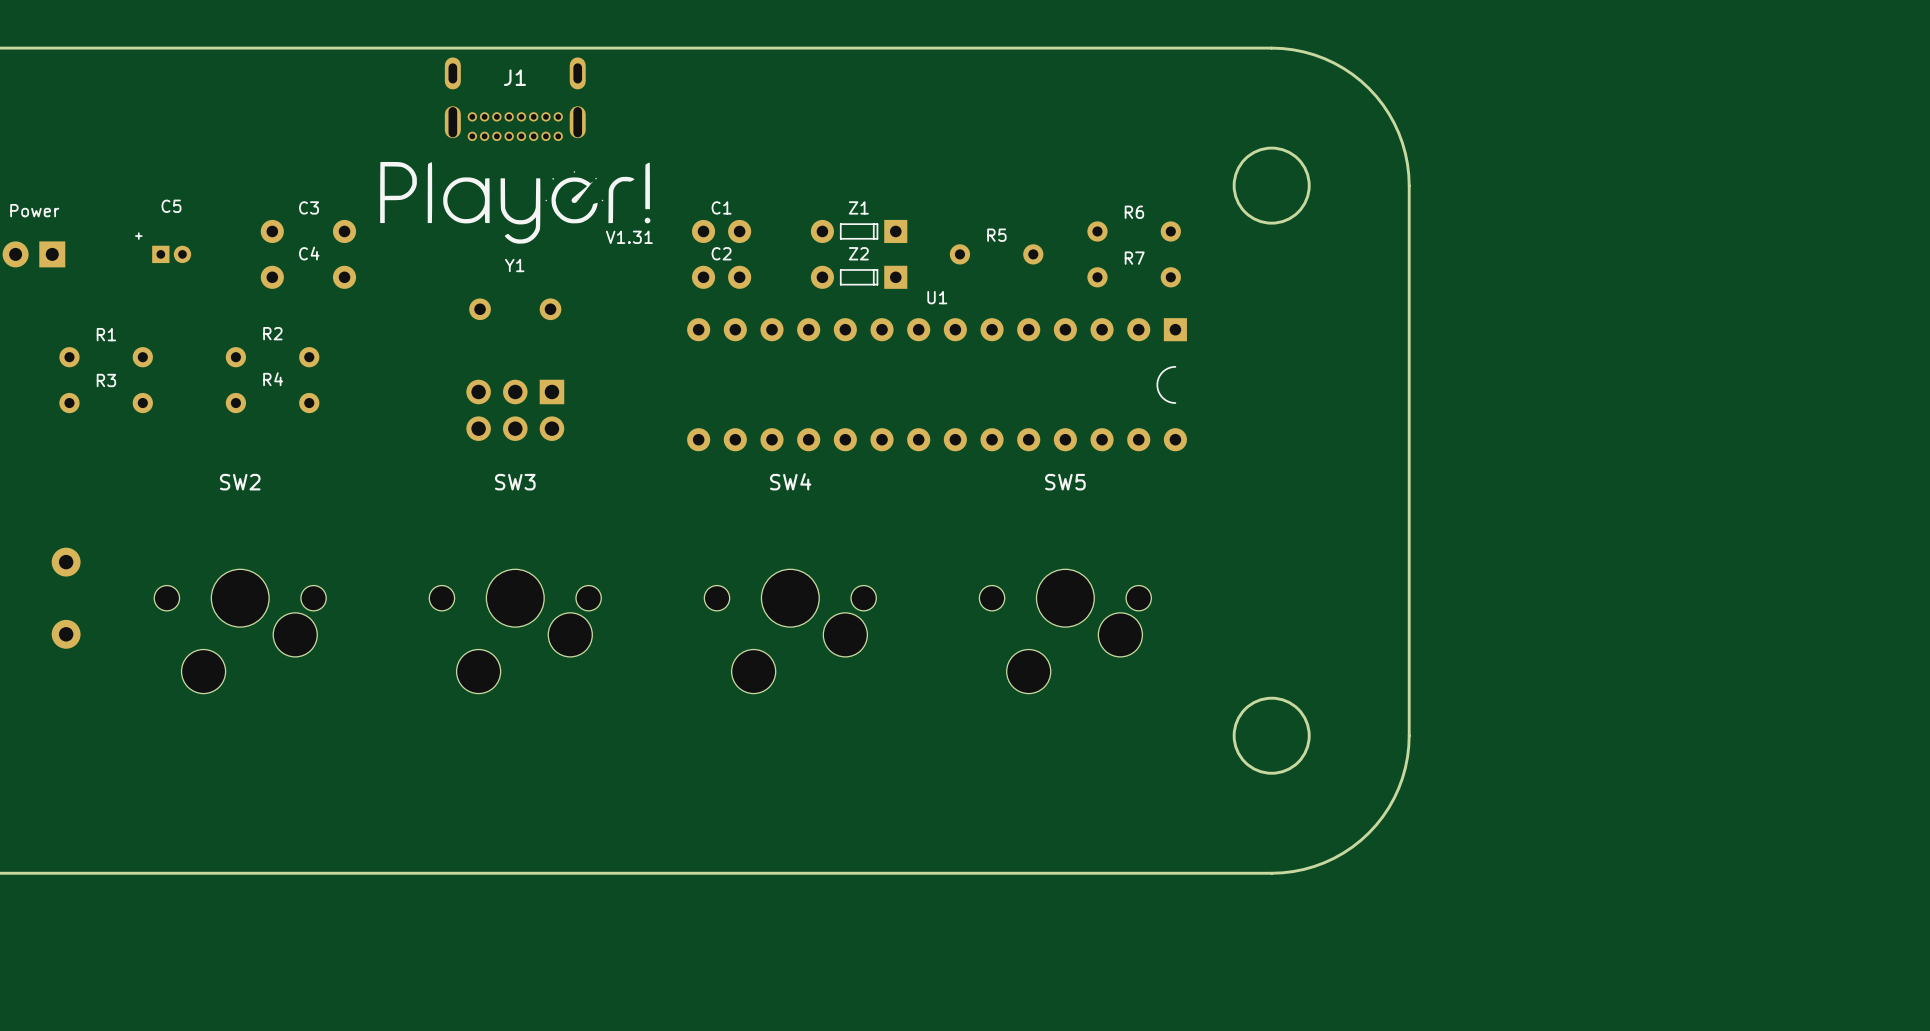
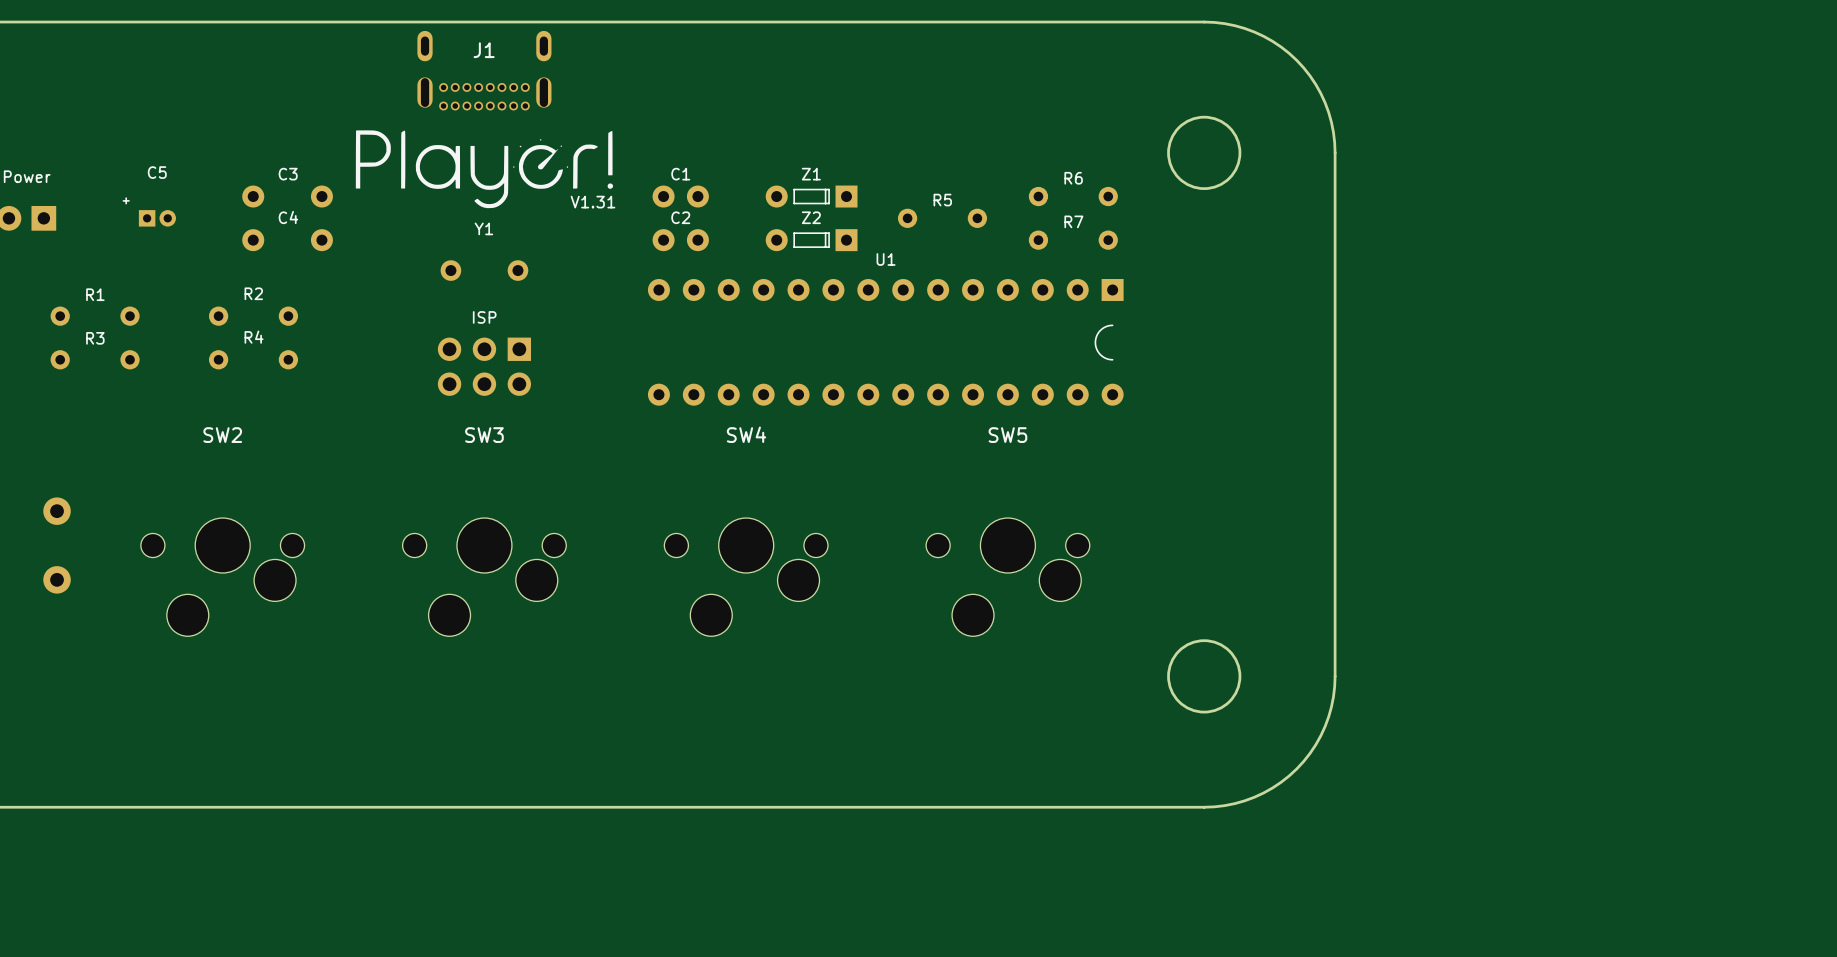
part value: none -> ISP (484, 317)

